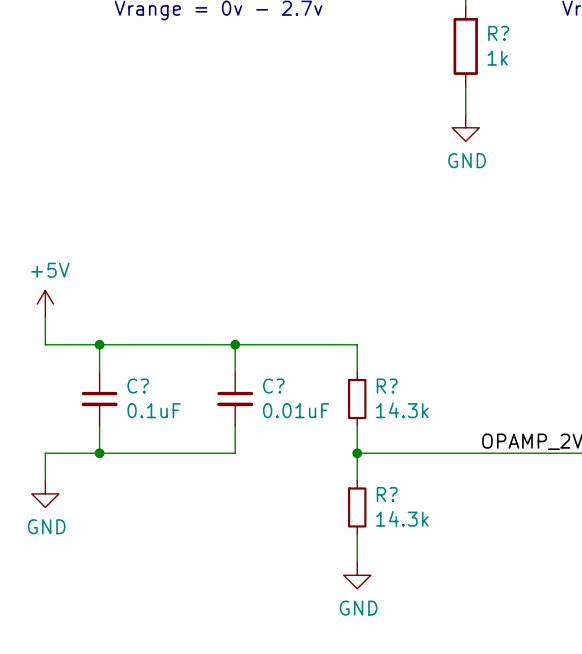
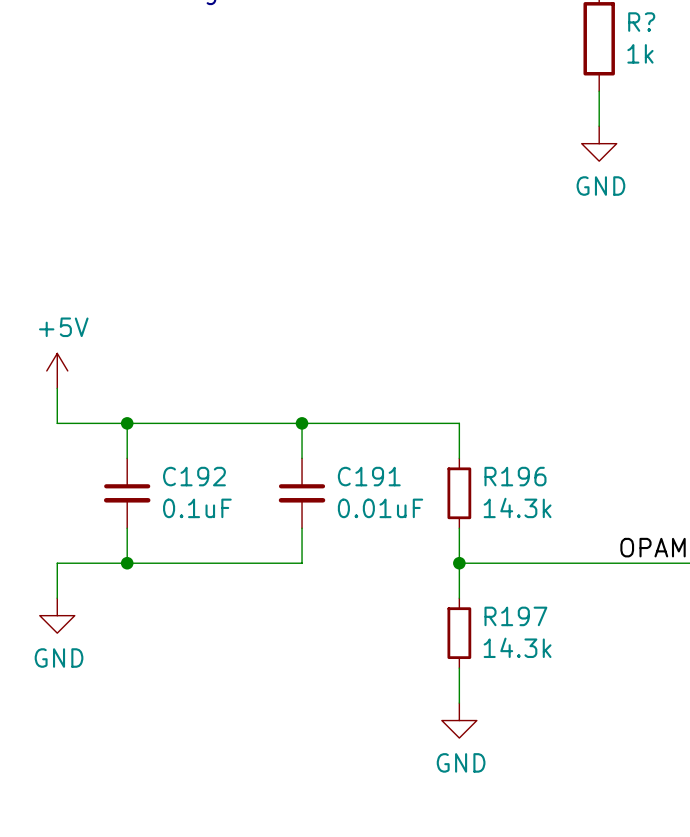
C? name: C? (138, 386) -> C192 (194, 476)
C? name: C? (273, 386) -> C191 (369, 476)
R? name: R? (387, 386) -> R196 (515, 476)
R? name: R? (387, 494) -> R197 (515, 616)

